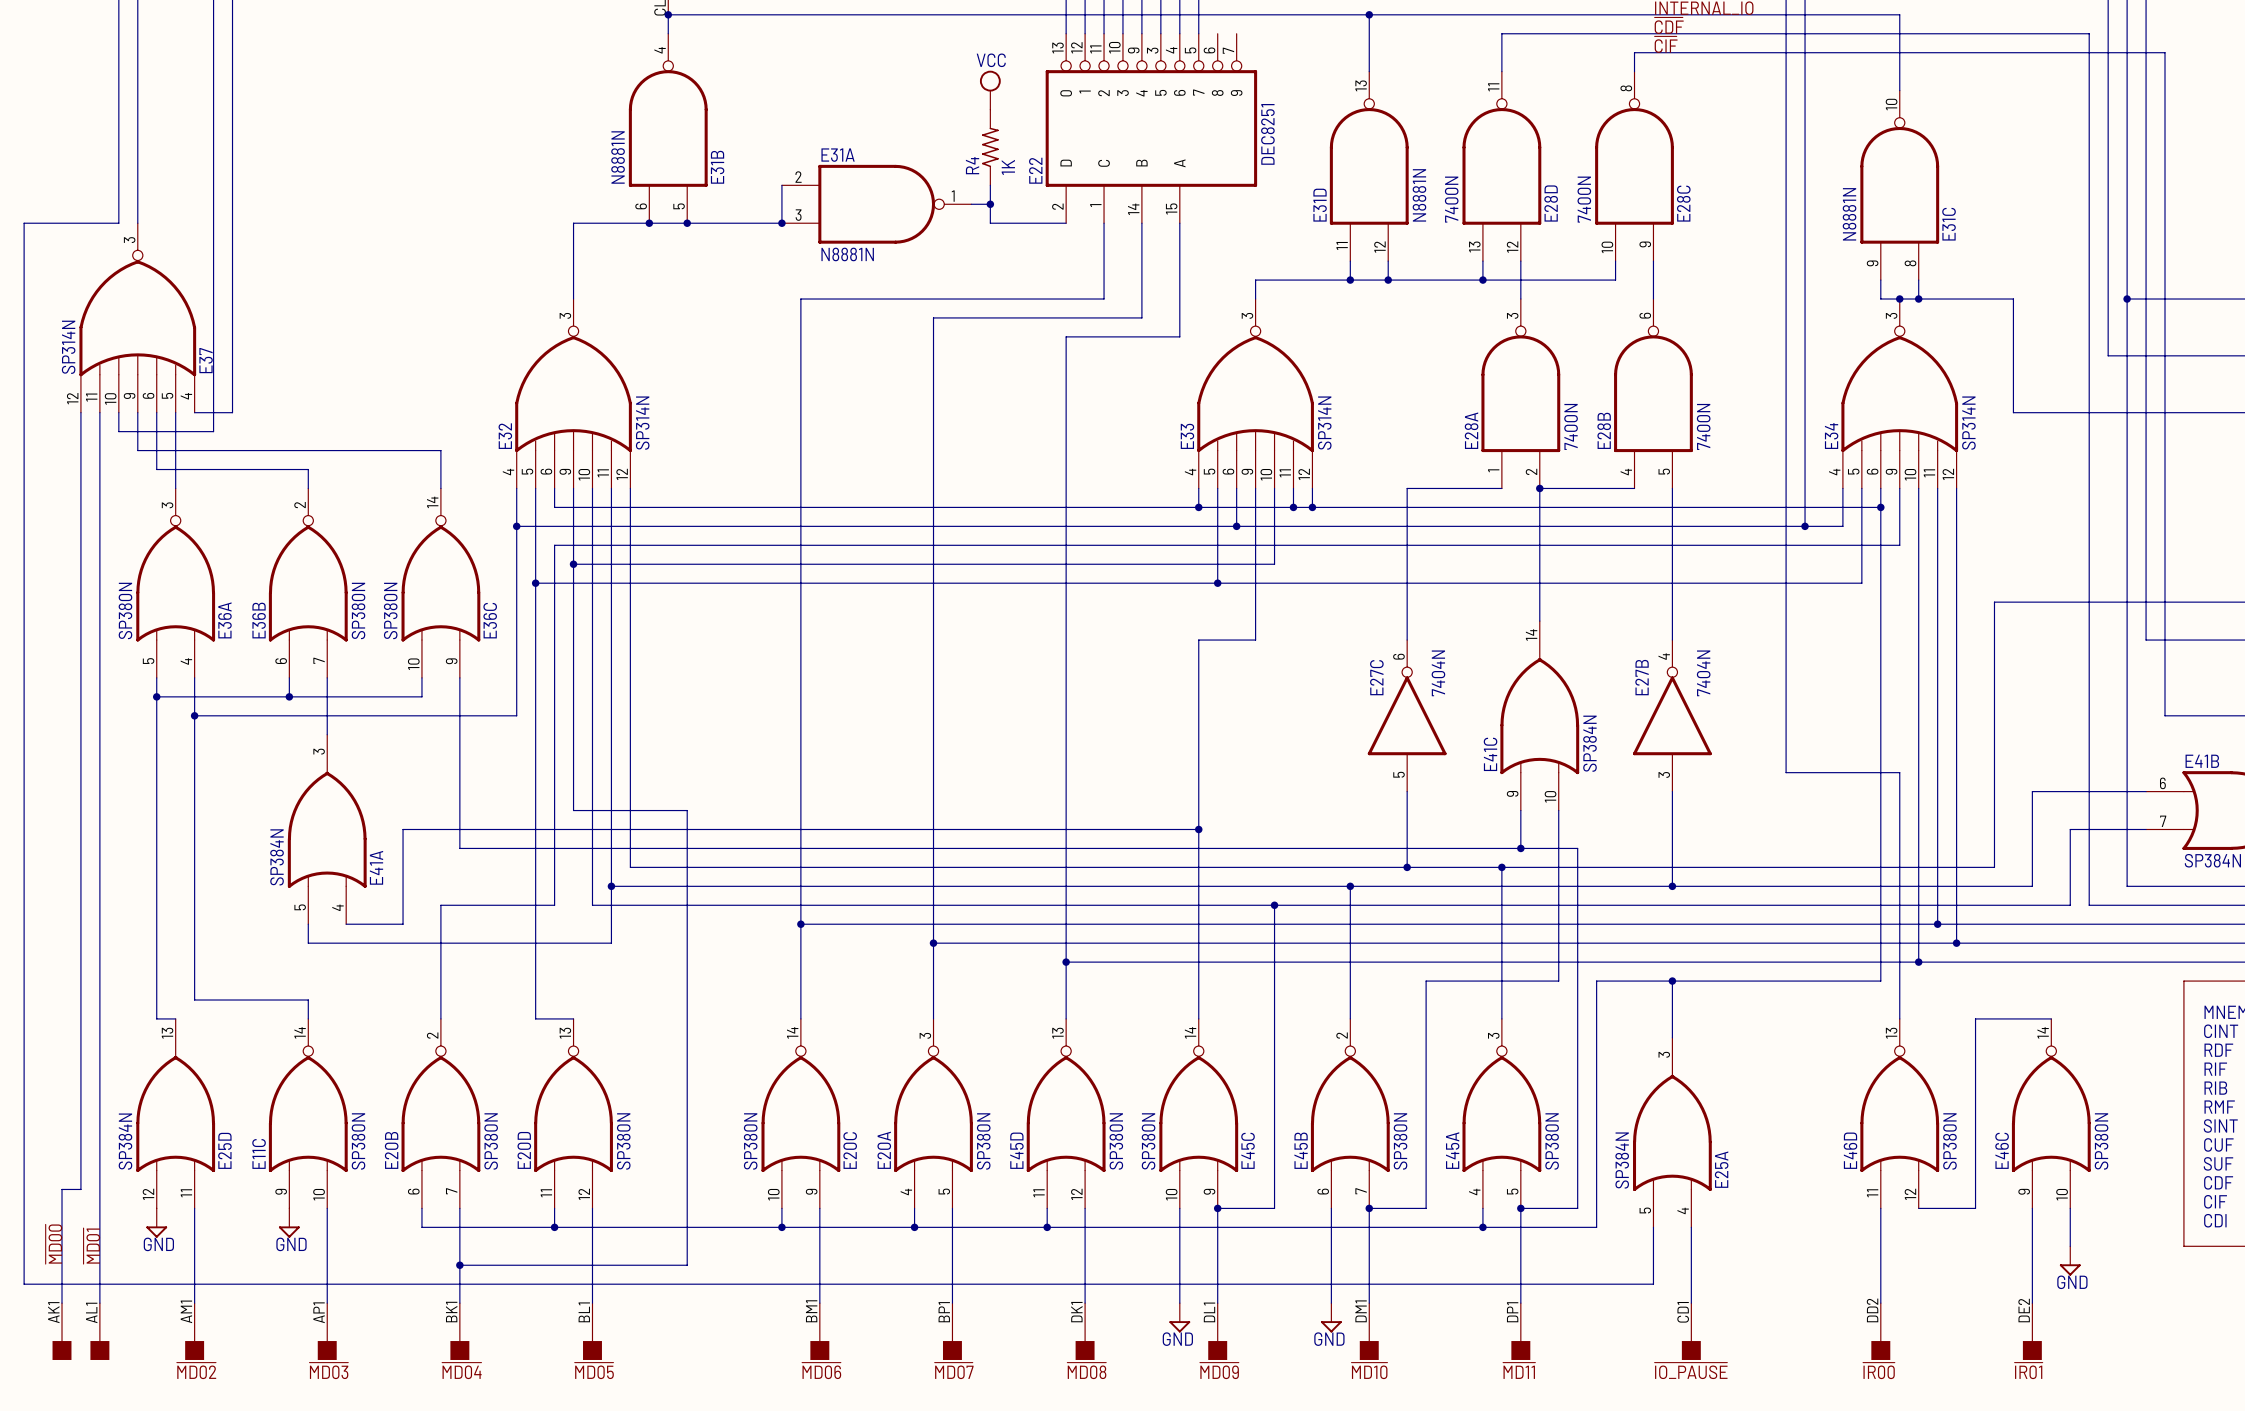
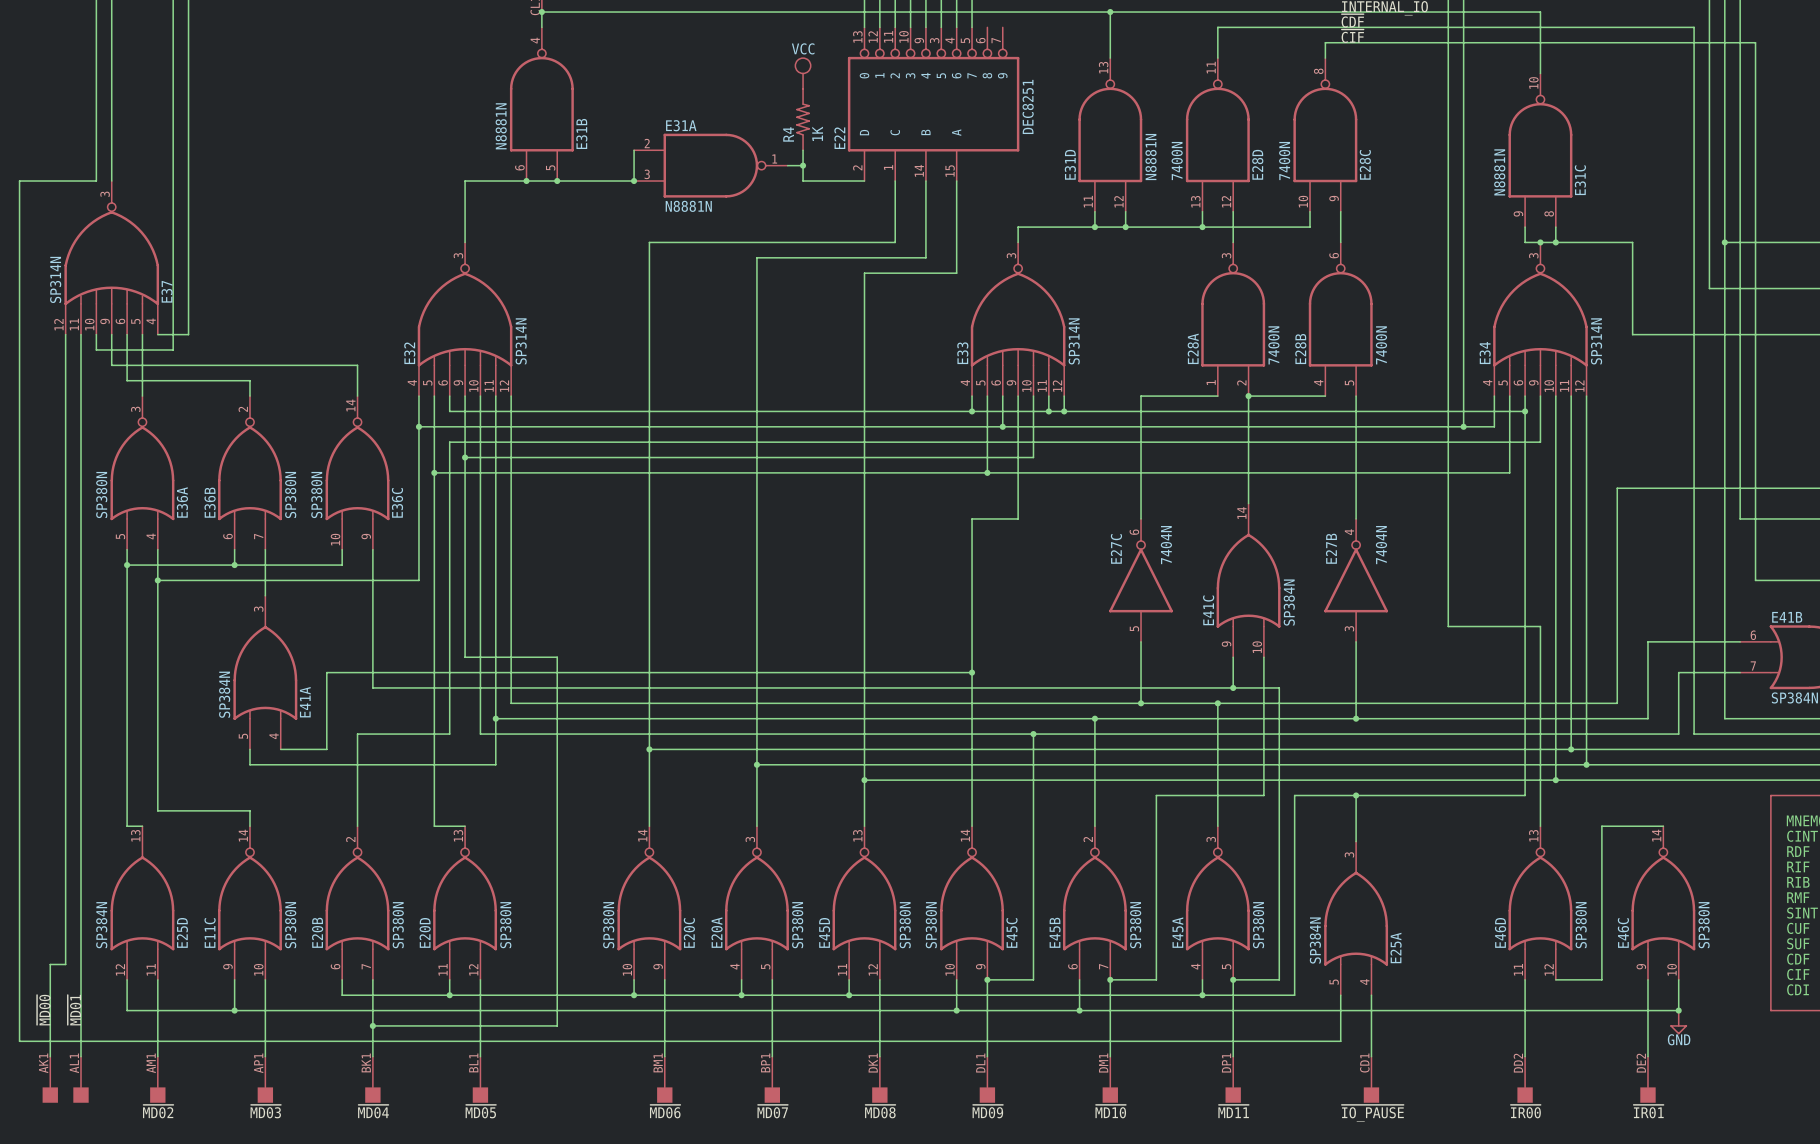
wire: none -> (127, 979) (127, 1010) (1678, 1010)
power symbol: GND (156, 1223) -> none
power symbol: GND (289, 1223) -> none
junction: none -> (234, 1010)
wire: (1179, 1246) (1179, 1303) -> none
junction: none -> (956, 1010)
wire: (1331, 1246) (1331, 1303) -> none
junction: none -> (1079, 1010)
junction: none -> (1678, 1010)
power symbol: GND (1179, 1317) -> none
power symbol: GND (1331, 1317) -> none

